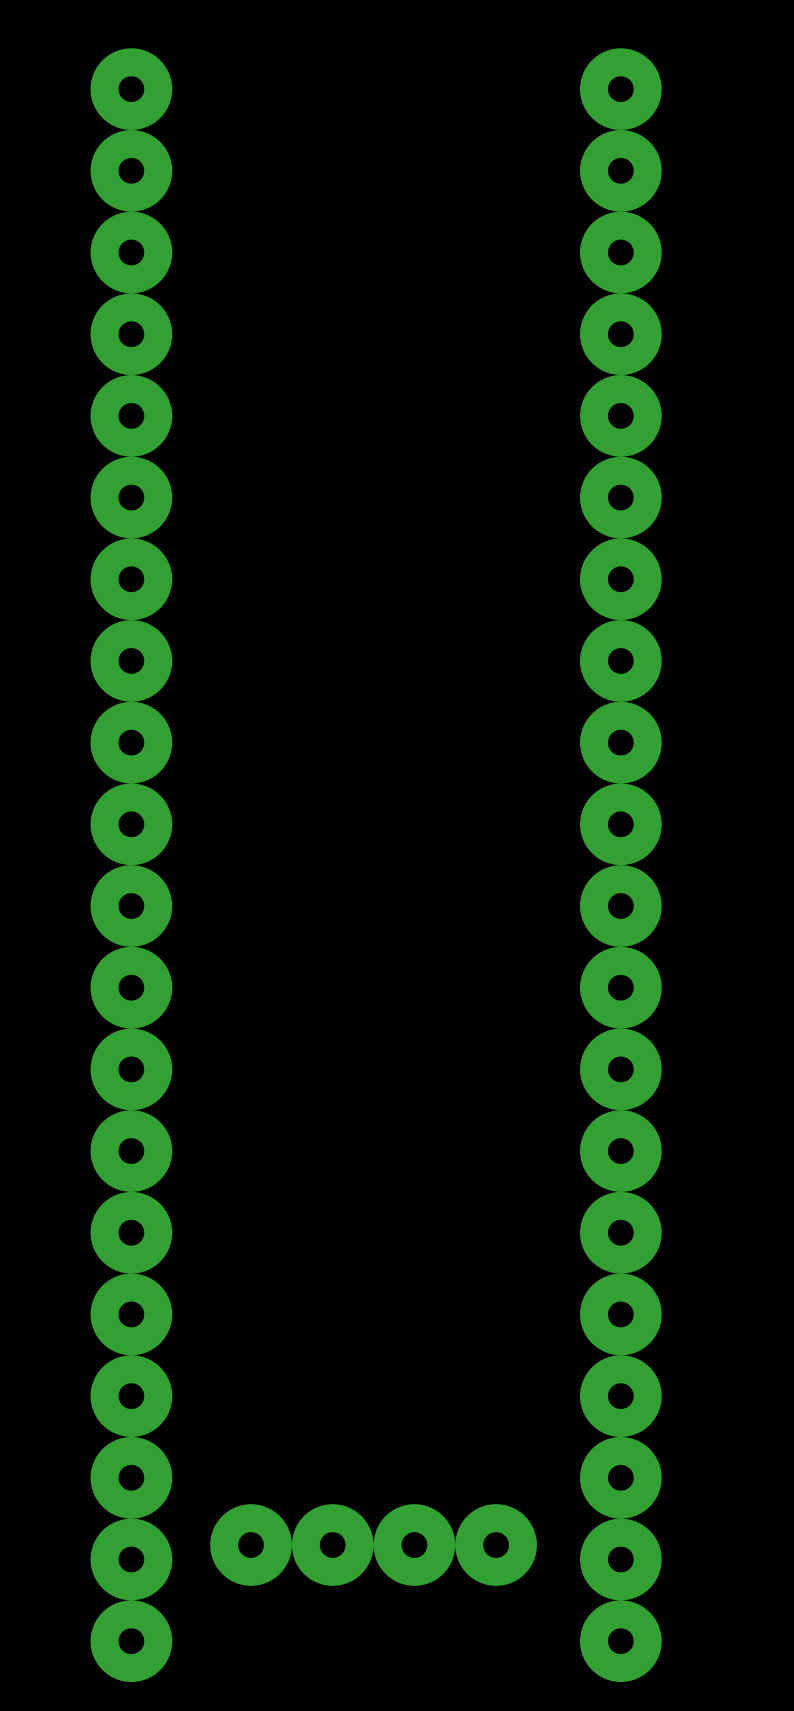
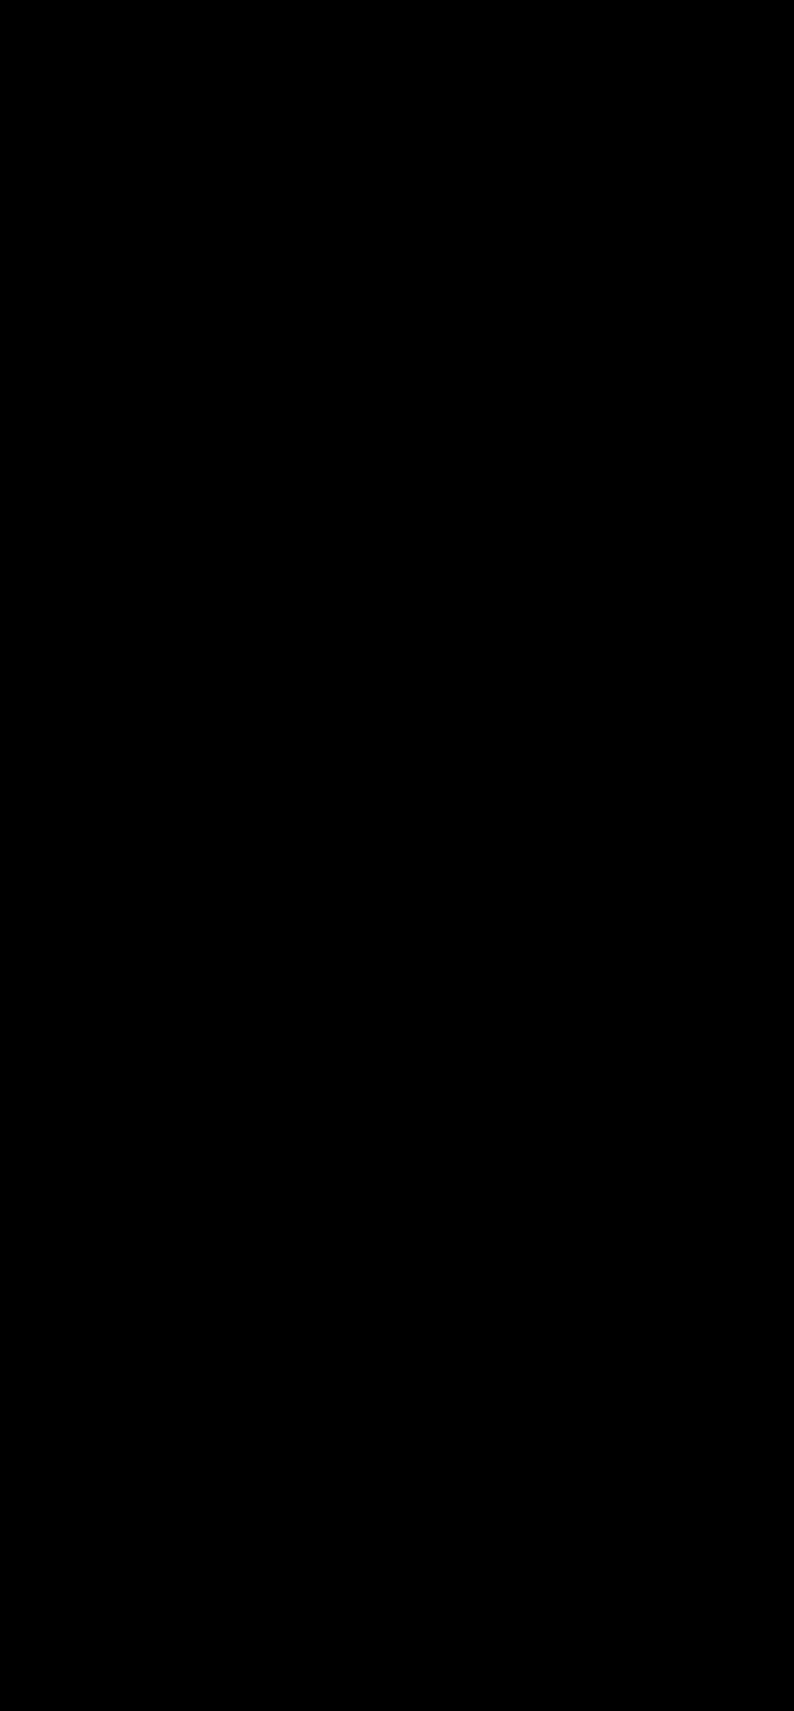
part: (376, 865) -> none

